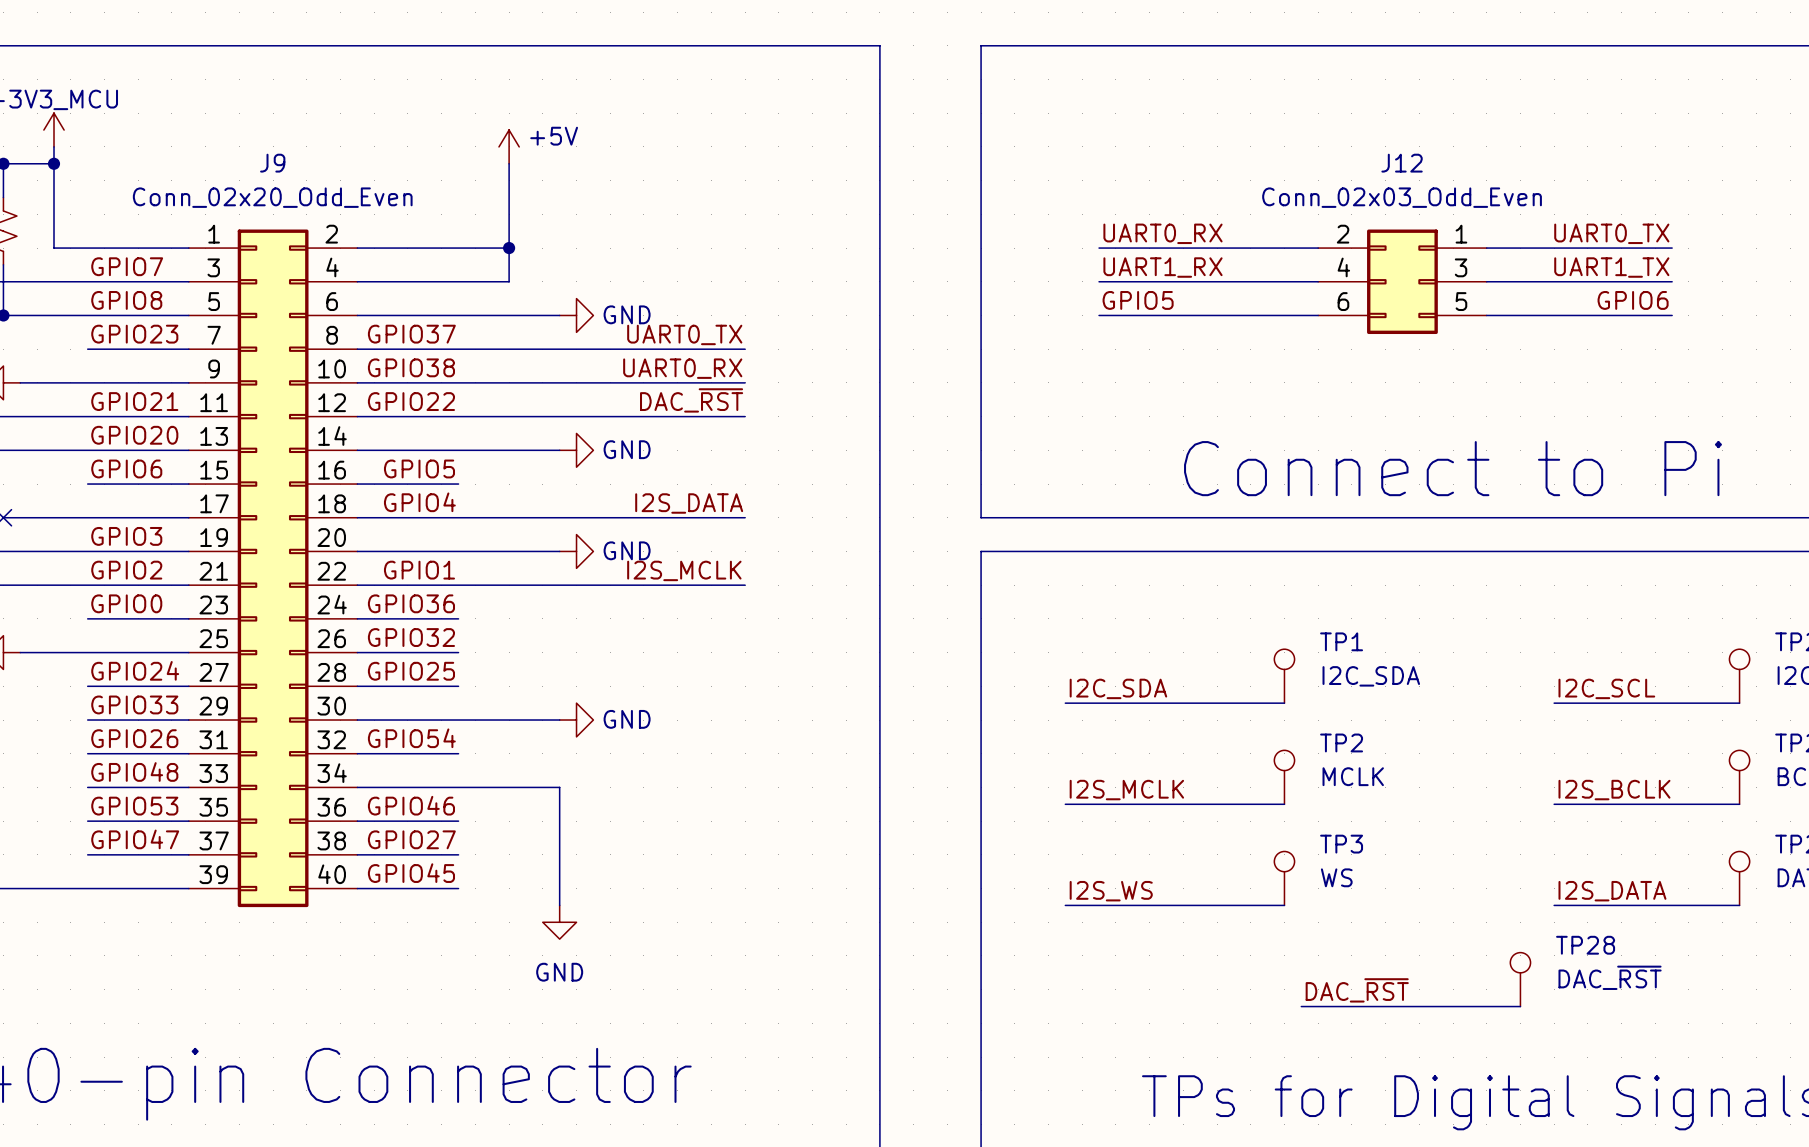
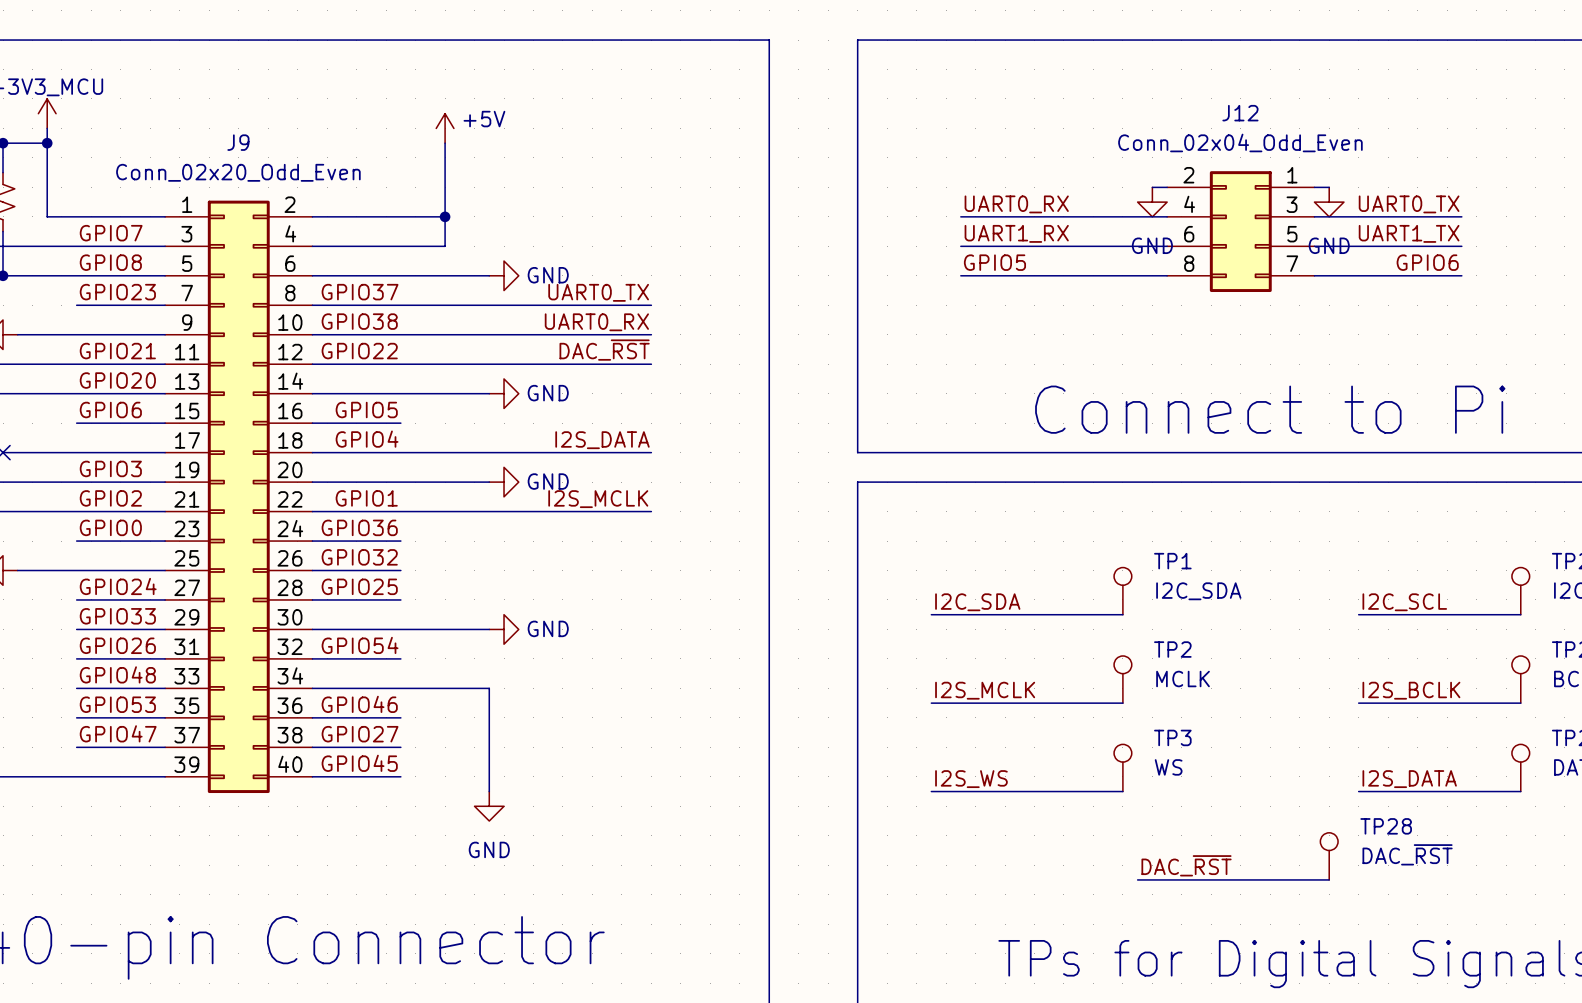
J12 value: Conn_02x03_Odd_Even (1402, 197) -> Conn_02x04_Odd_Even (1240, 142)
wire: none -> (1152, 187) (1167, 187)
wire: none -> (1314, 187) (1329, 187)
J12 symbol: [1318, 229, 1487, 335] -> [1167, 171, 1315, 293]
power symbol: none -> GND (1152, 202)
power symbol: none -> GND (1329, 202)

